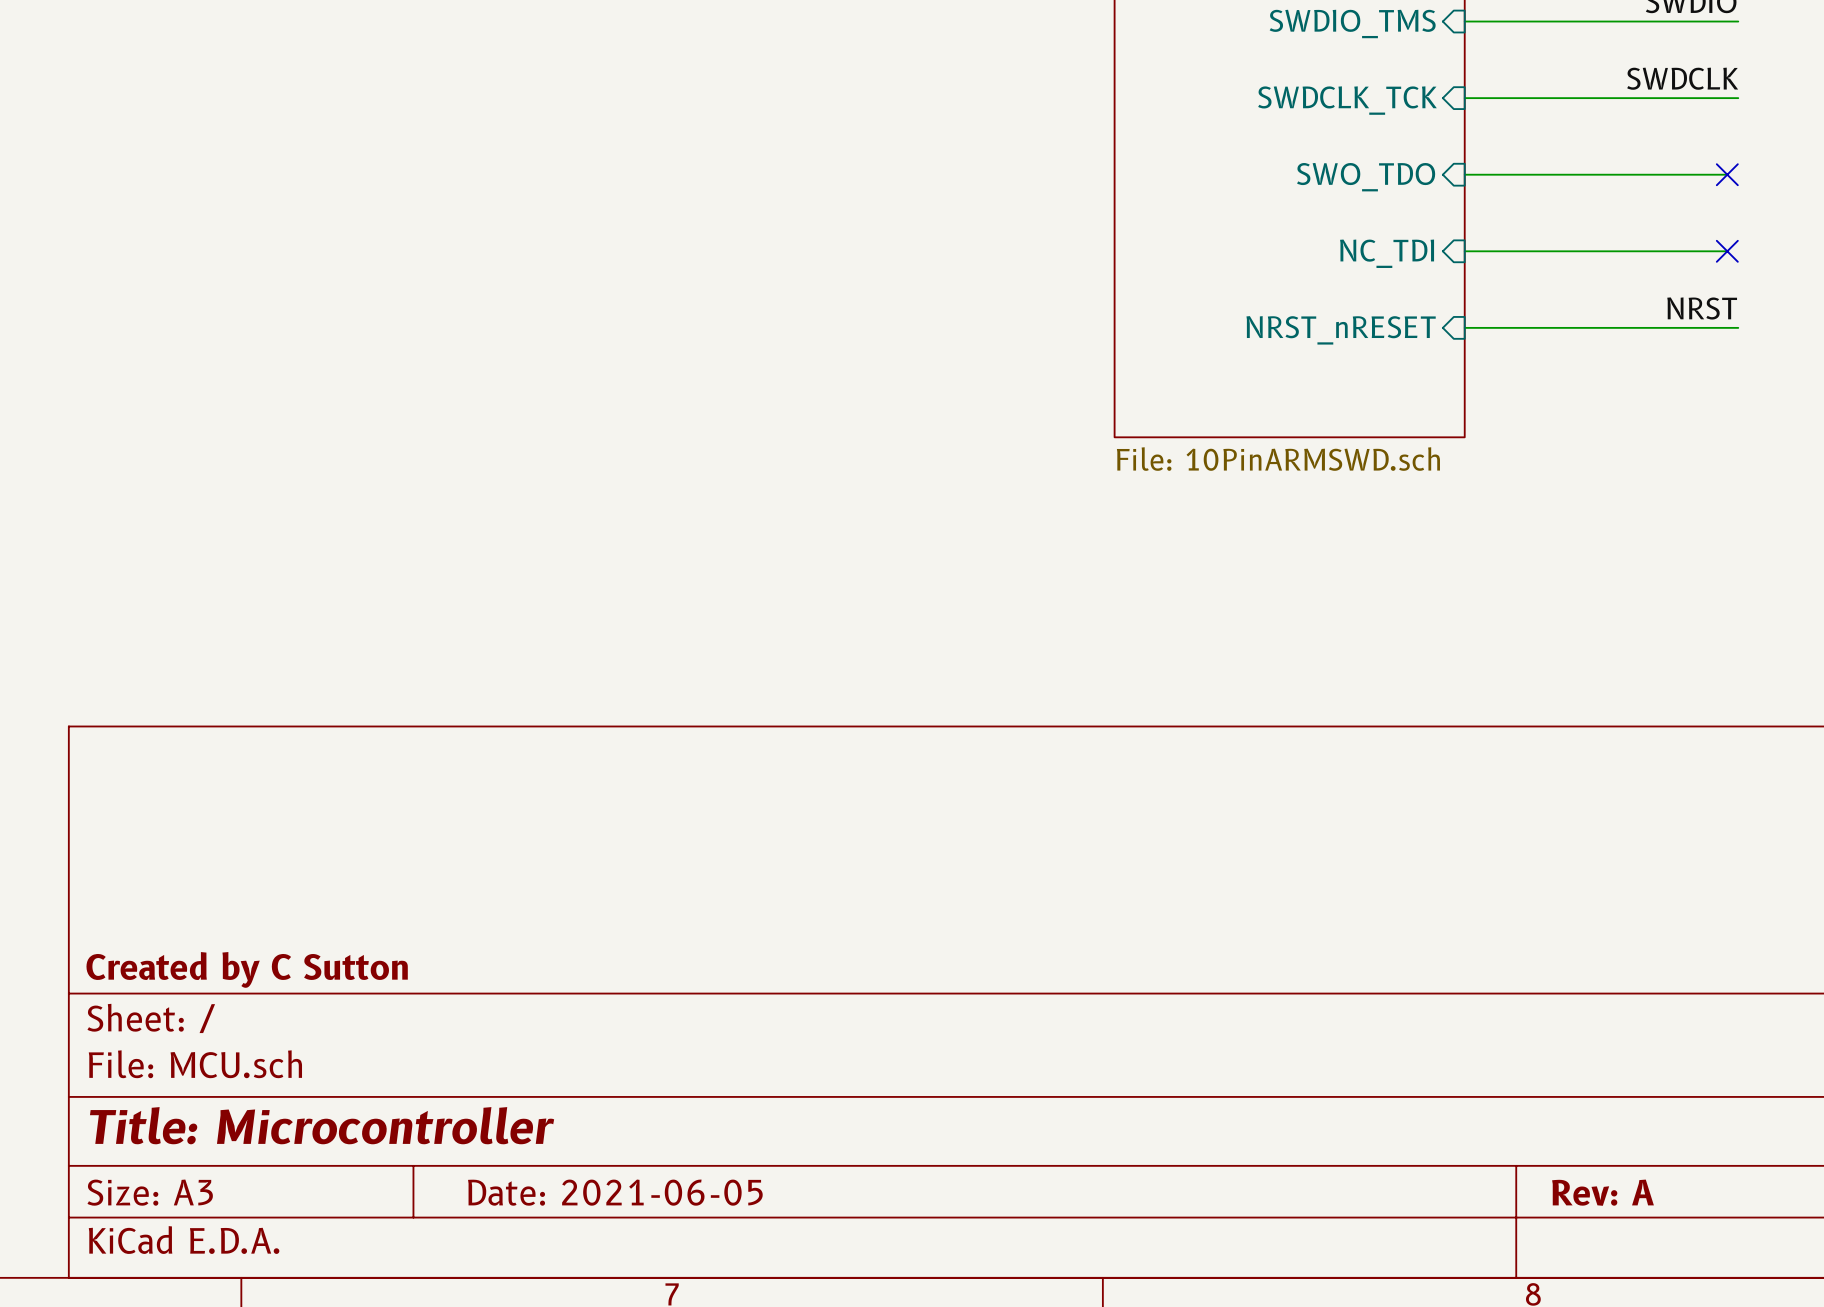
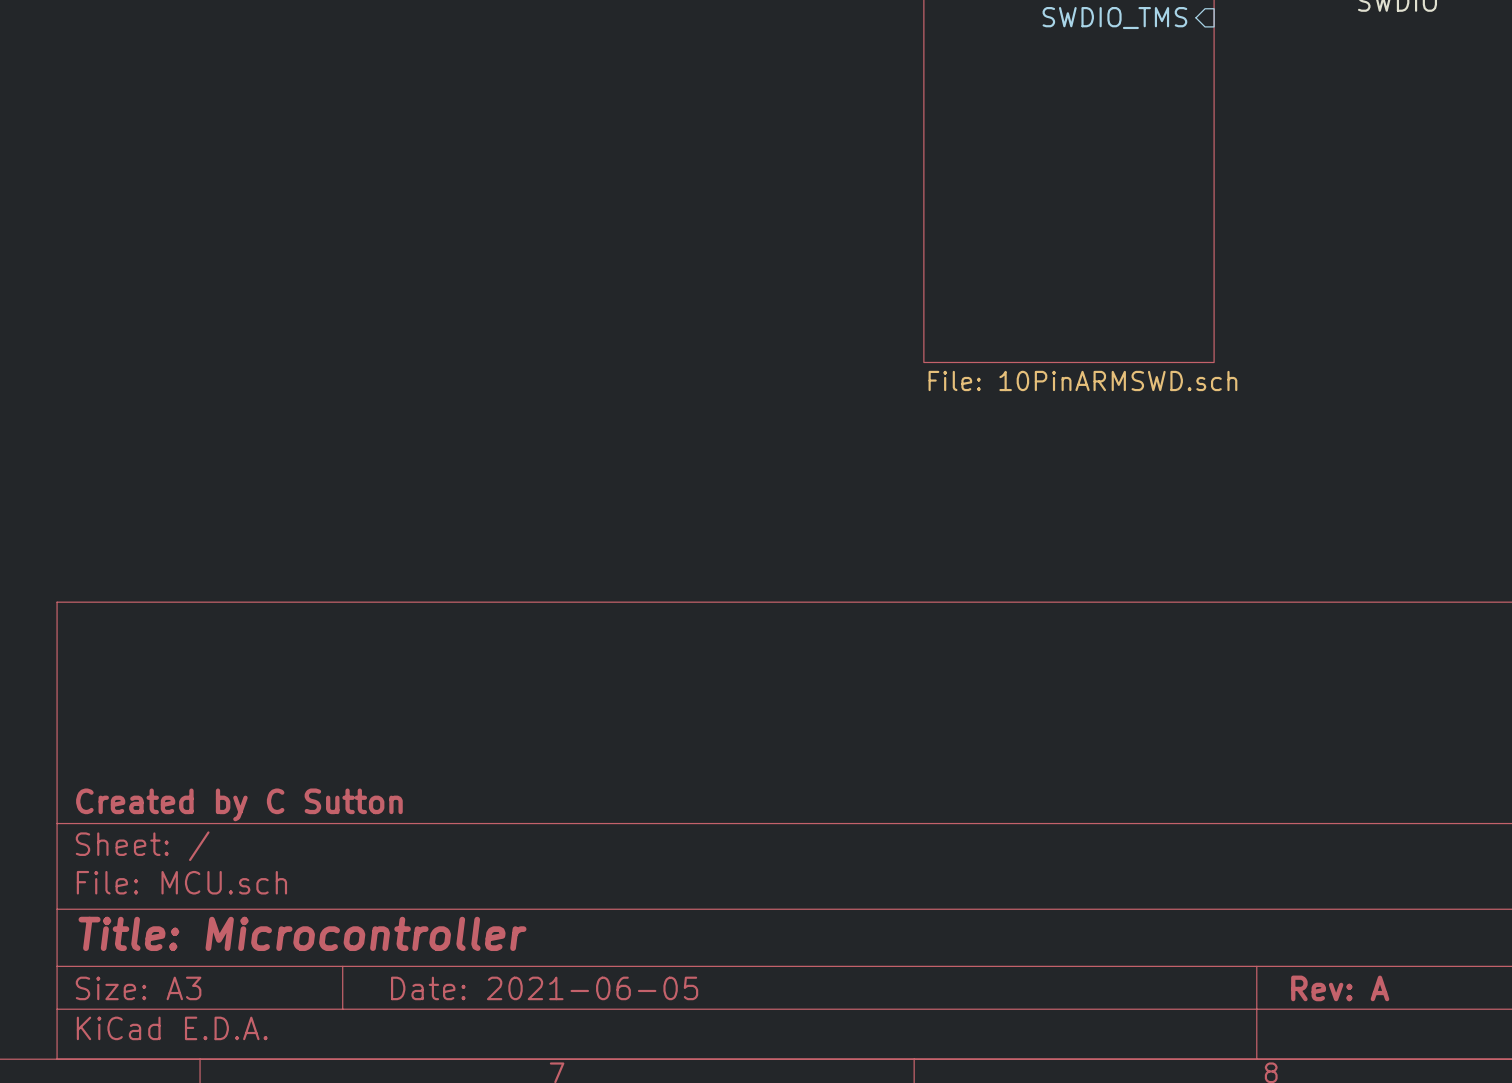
wire: (1464, 21) (1738, 21) -> none
label: SWDCLK (1682, 78) -> none
wire: (1464, 98) (1738, 98) -> none
sheet pin: SWDCLK_TCK (1347, 100) -> none
wire: (1464, 174) (1727, 174) -> none
no-connect mark: (1727, 174) -> none
sheet pin: SWO_TDO (1366, 177) -> none
wire: (1464, 251) (1727, 251) -> none
no-connect mark: (1727, 251) -> none
sheet pin: NC_TDI (1387, 253) -> none
label: NRST (1702, 308) -> none
wire: (1464, 327) (1738, 327) -> none
sheet pin: NRST_nRESET (1341, 330) -> none

